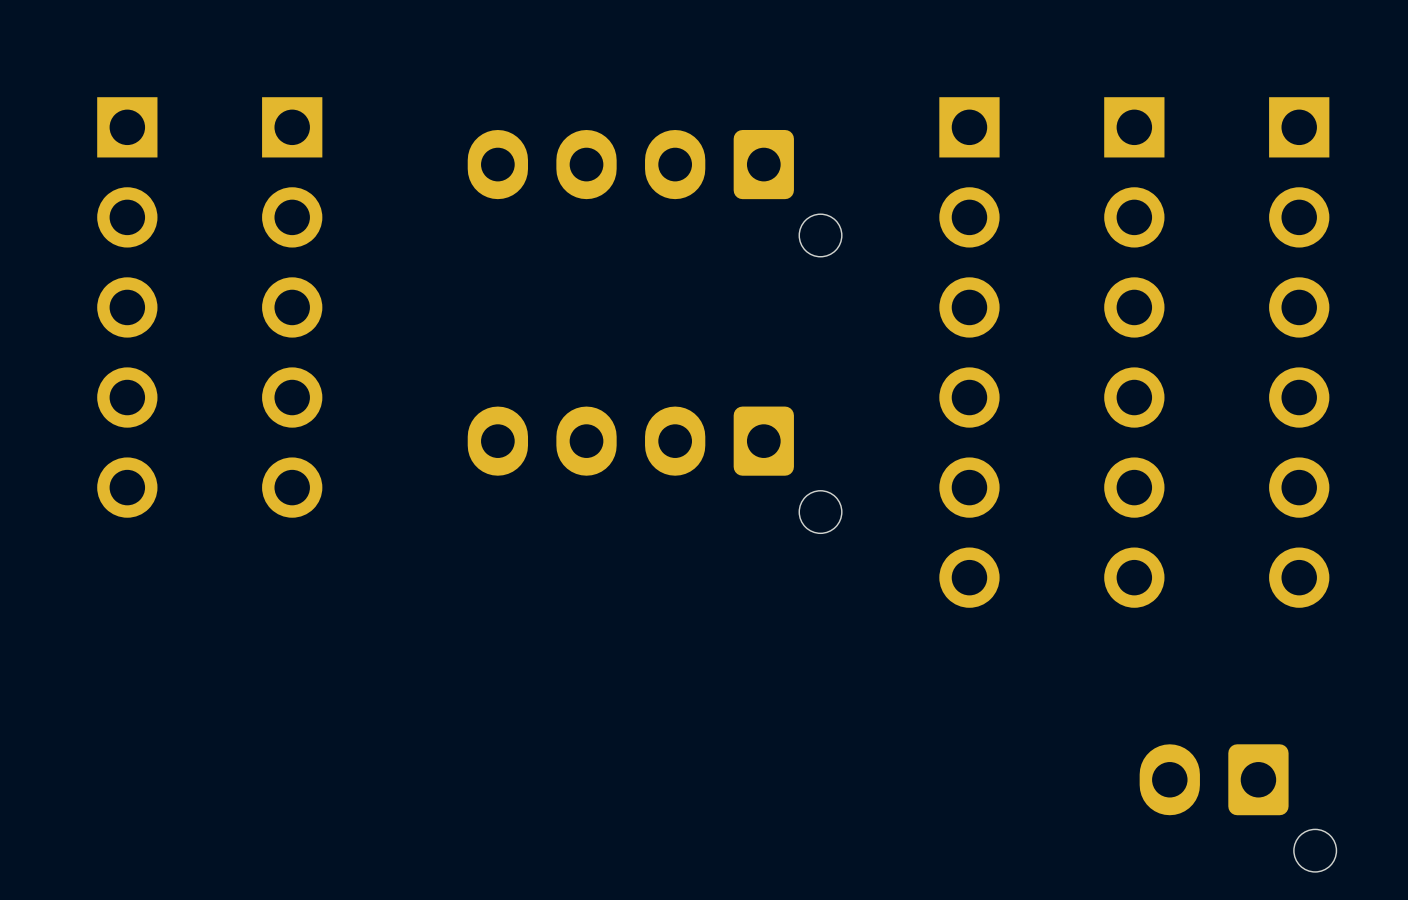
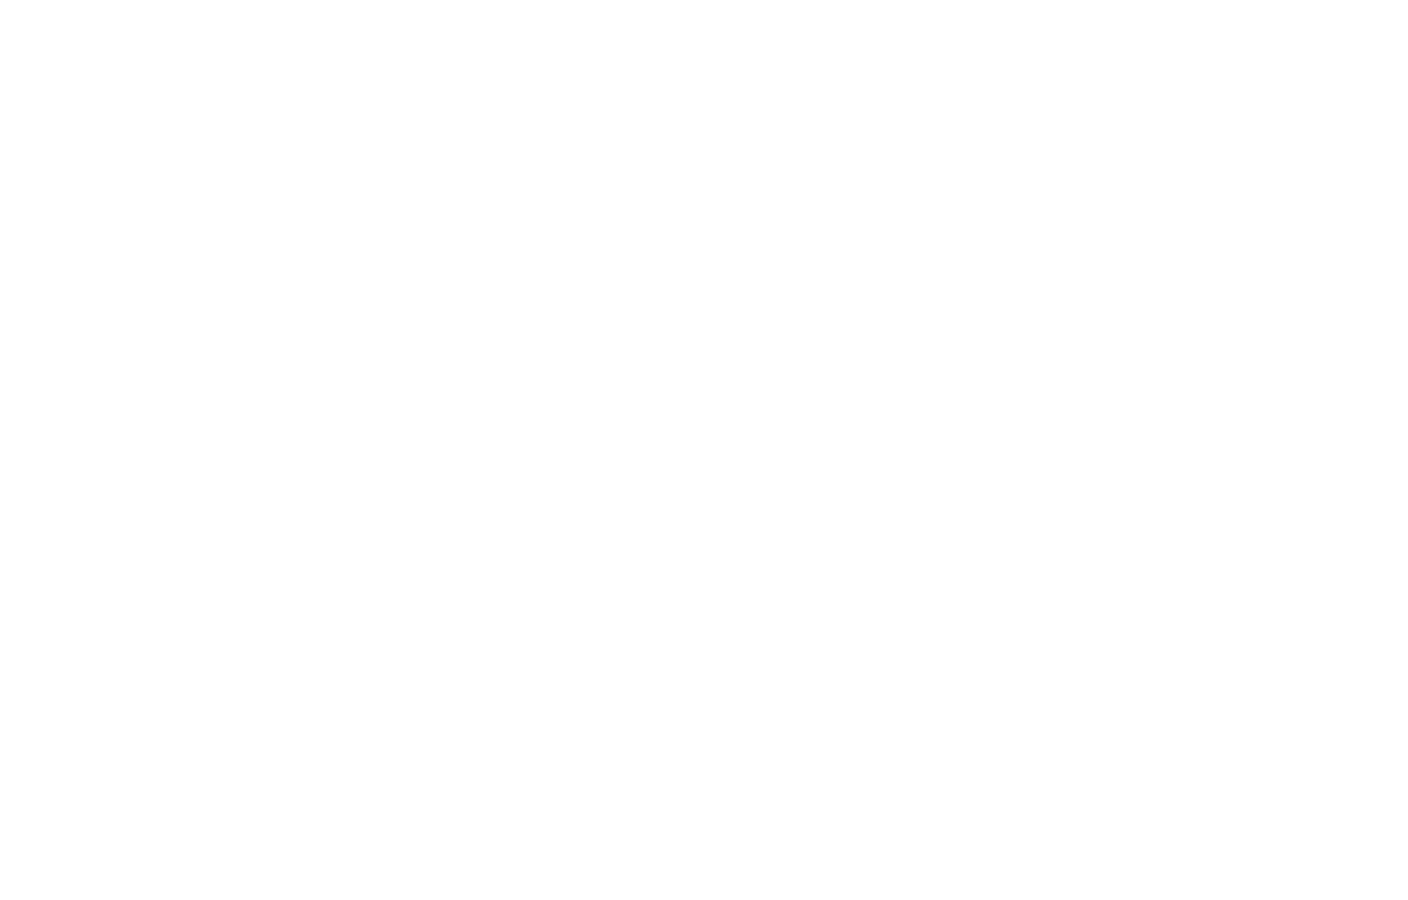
part: (654, 193) -> none
part: (127, 307) -> none
part: (292, 307) -> none
part: (969, 352) -> none
part: (1134, 352) -> none
part: (1299, 352) -> none
part: (654, 469) -> none
part: (1238, 808) -> none

